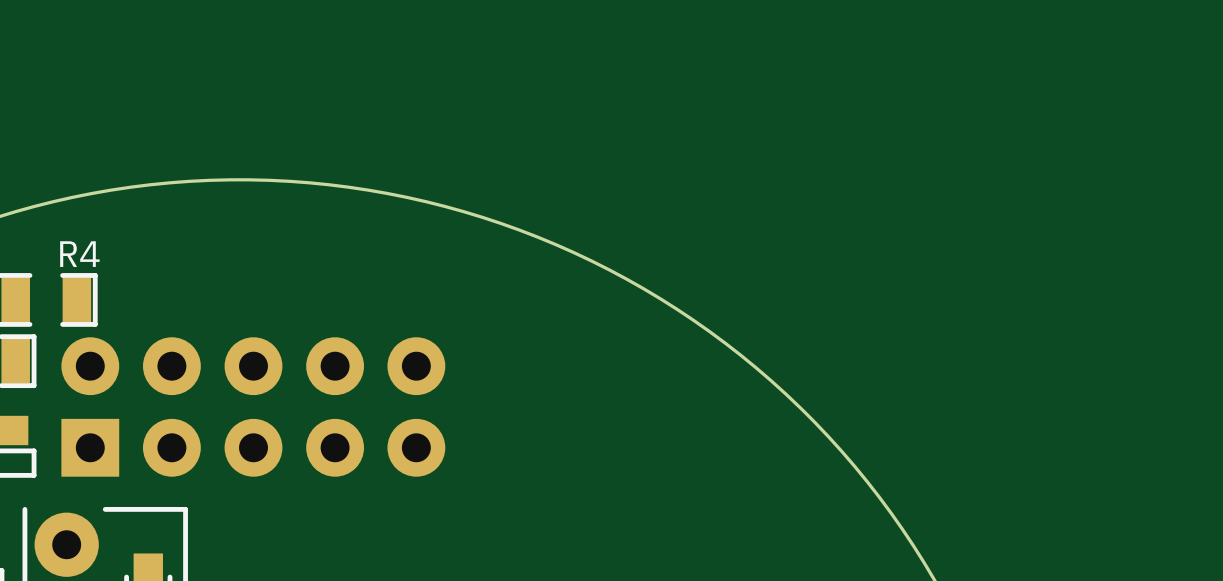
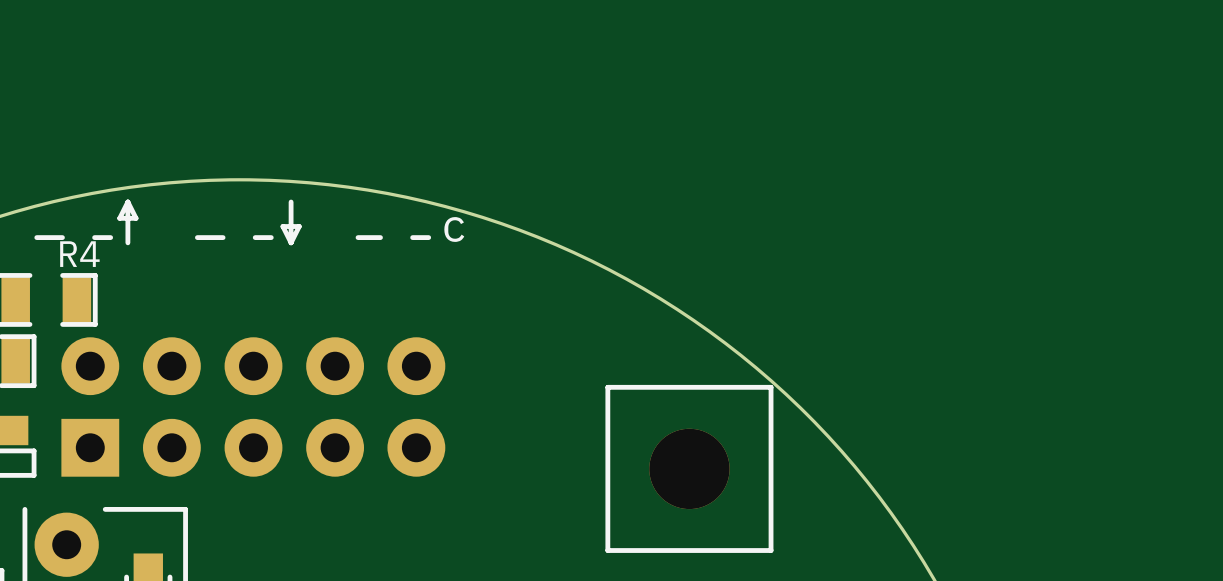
line: none -> (127, 202) (136, 218) (119, 218) (127, 202)
line: none -> (127, 202) (127, 242)
line: none -> (291, 202) (291, 242)
text: none -> c (454, 229)
line: none -> (36, 237) (62, 237)
line: none -> (94, 237) (110, 237)
line: none -> (197, 237) (223, 237)
line: none -> (255, 237) (271, 237)
line: none -> (358, 237) (380, 237)
line: none -> (412, 237) (428, 237)
line: none -> (291, 242) (299, 226) (282, 226) (291, 242)
part: none -> (689, 468)

